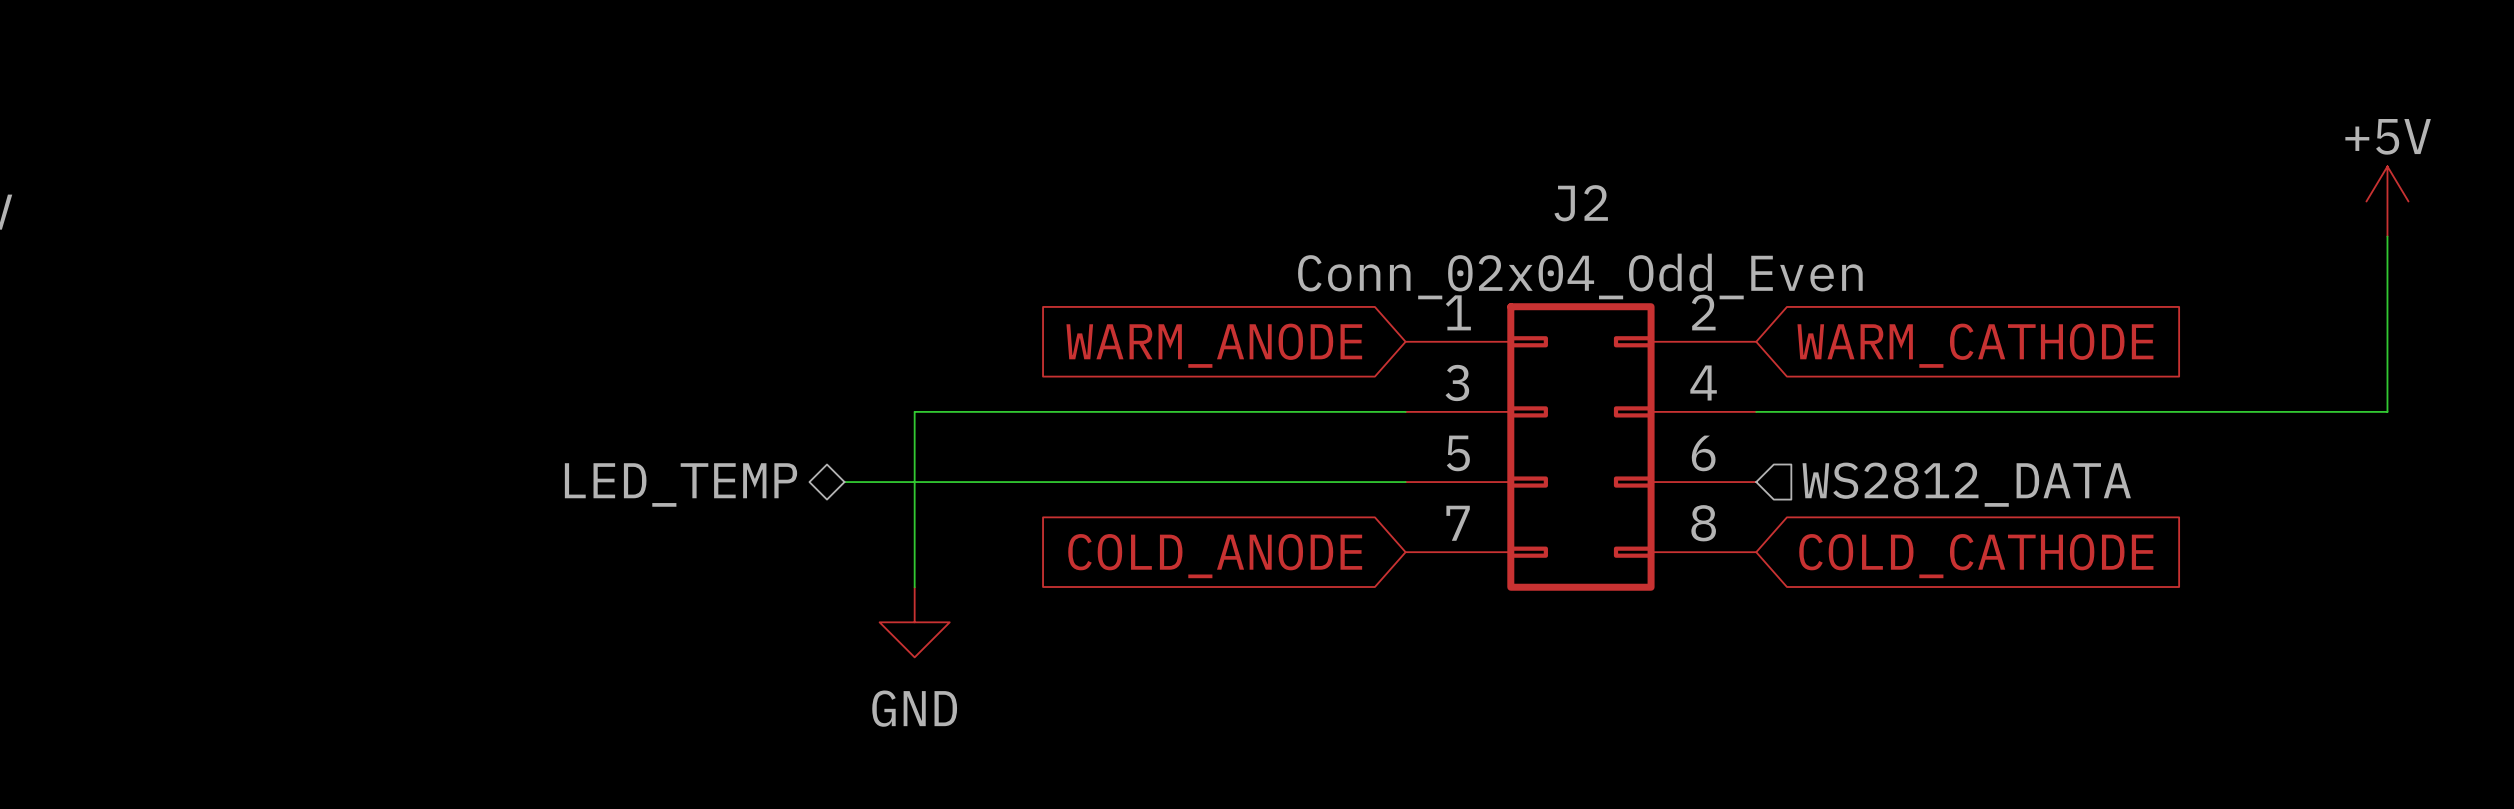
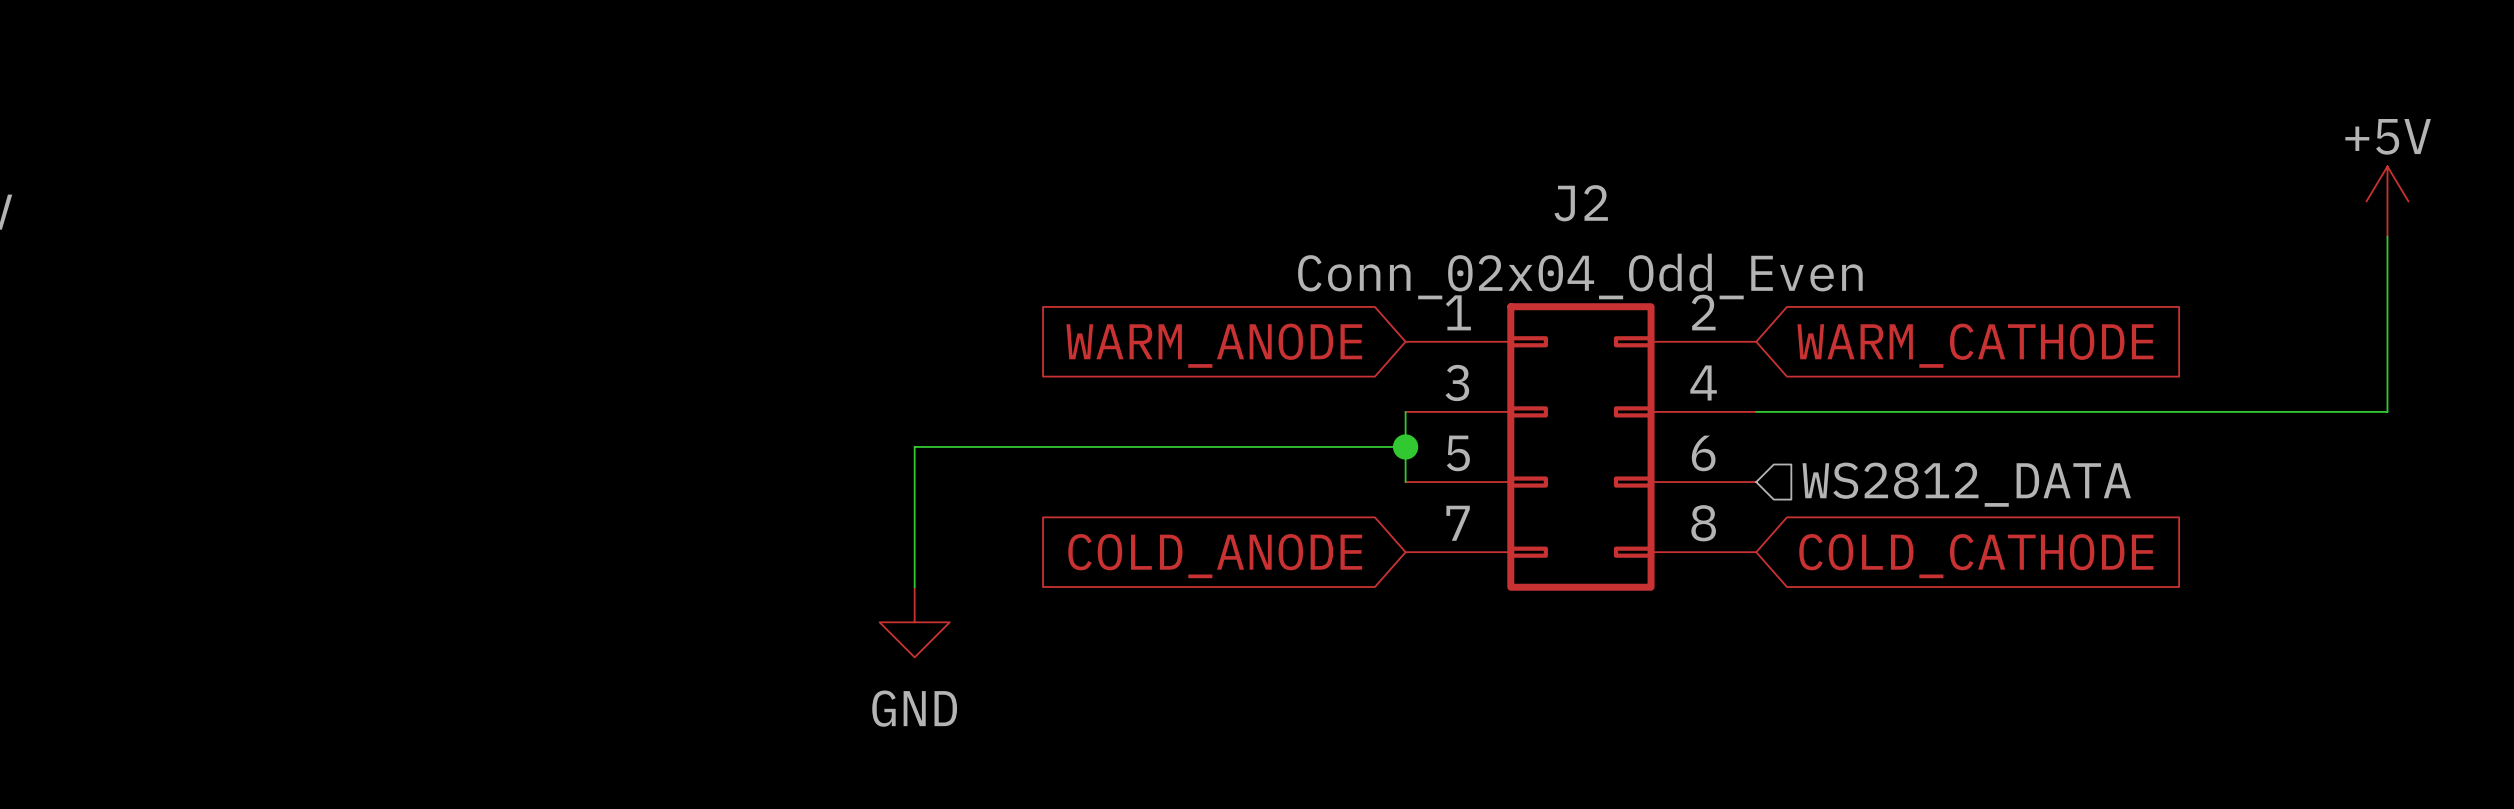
wire: (1405, 411) (914, 411) (914, 446) -> (1405, 446) (914, 446)
junction: none -> (1405, 446)
wire: (844, 482) (1405, 482) -> (1405, 411) (1405, 482)
hierarchical label: LED_TEMP (681, 484) -> none

